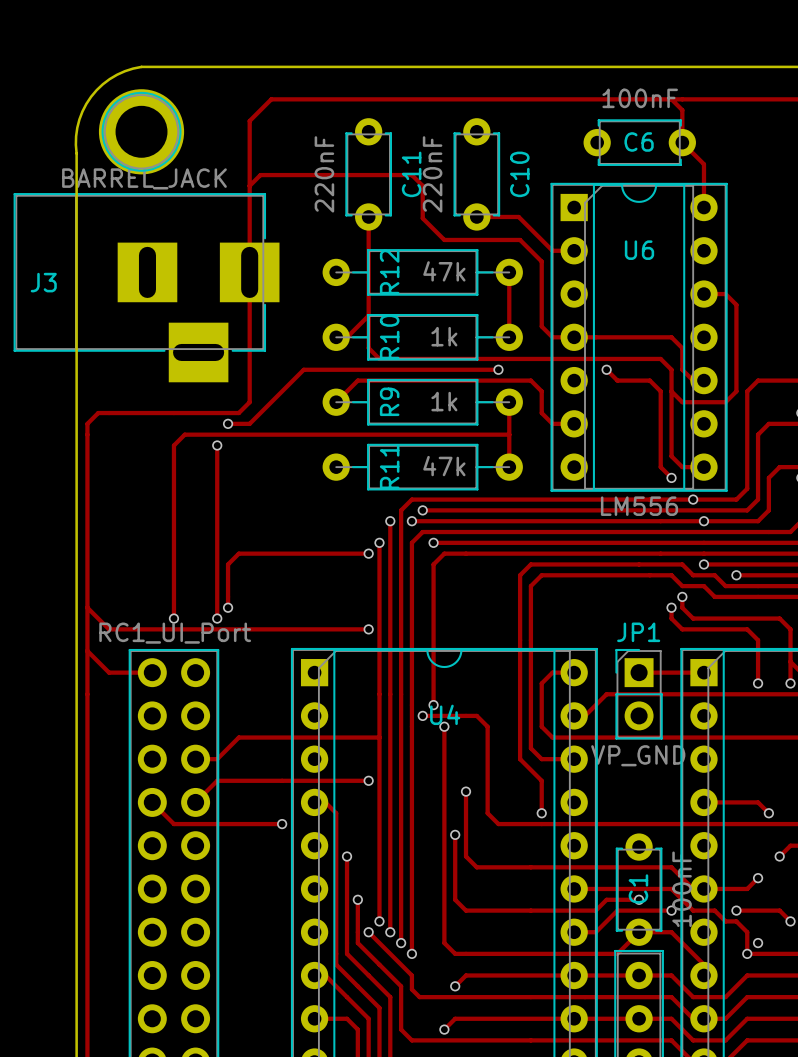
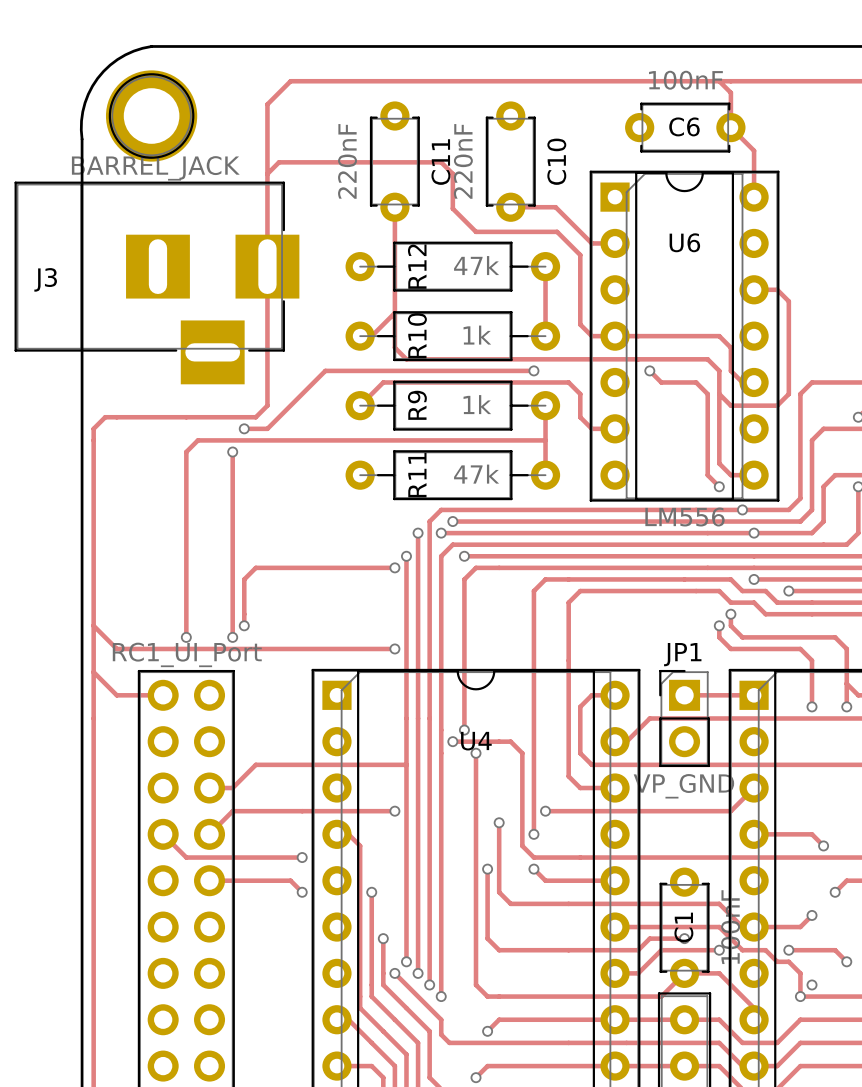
track: (530, 564) (520, 575) (520, 759) (541, 780) (541, 813) -> (568, 579) (545, 579) (533, 591) (533, 834)
track: none -> (754, 788) (730, 811) (545, 811)
via: none -> (545, 811)
via: none -> (533, 834)
via: (541, 813) -> none
track: none -> (533, 869) (545, 880) (615, 880)
via: none -> (533, 869)
track: none -> (209, 880) (290, 880) (302, 892)
via: none -> (302, 892)

